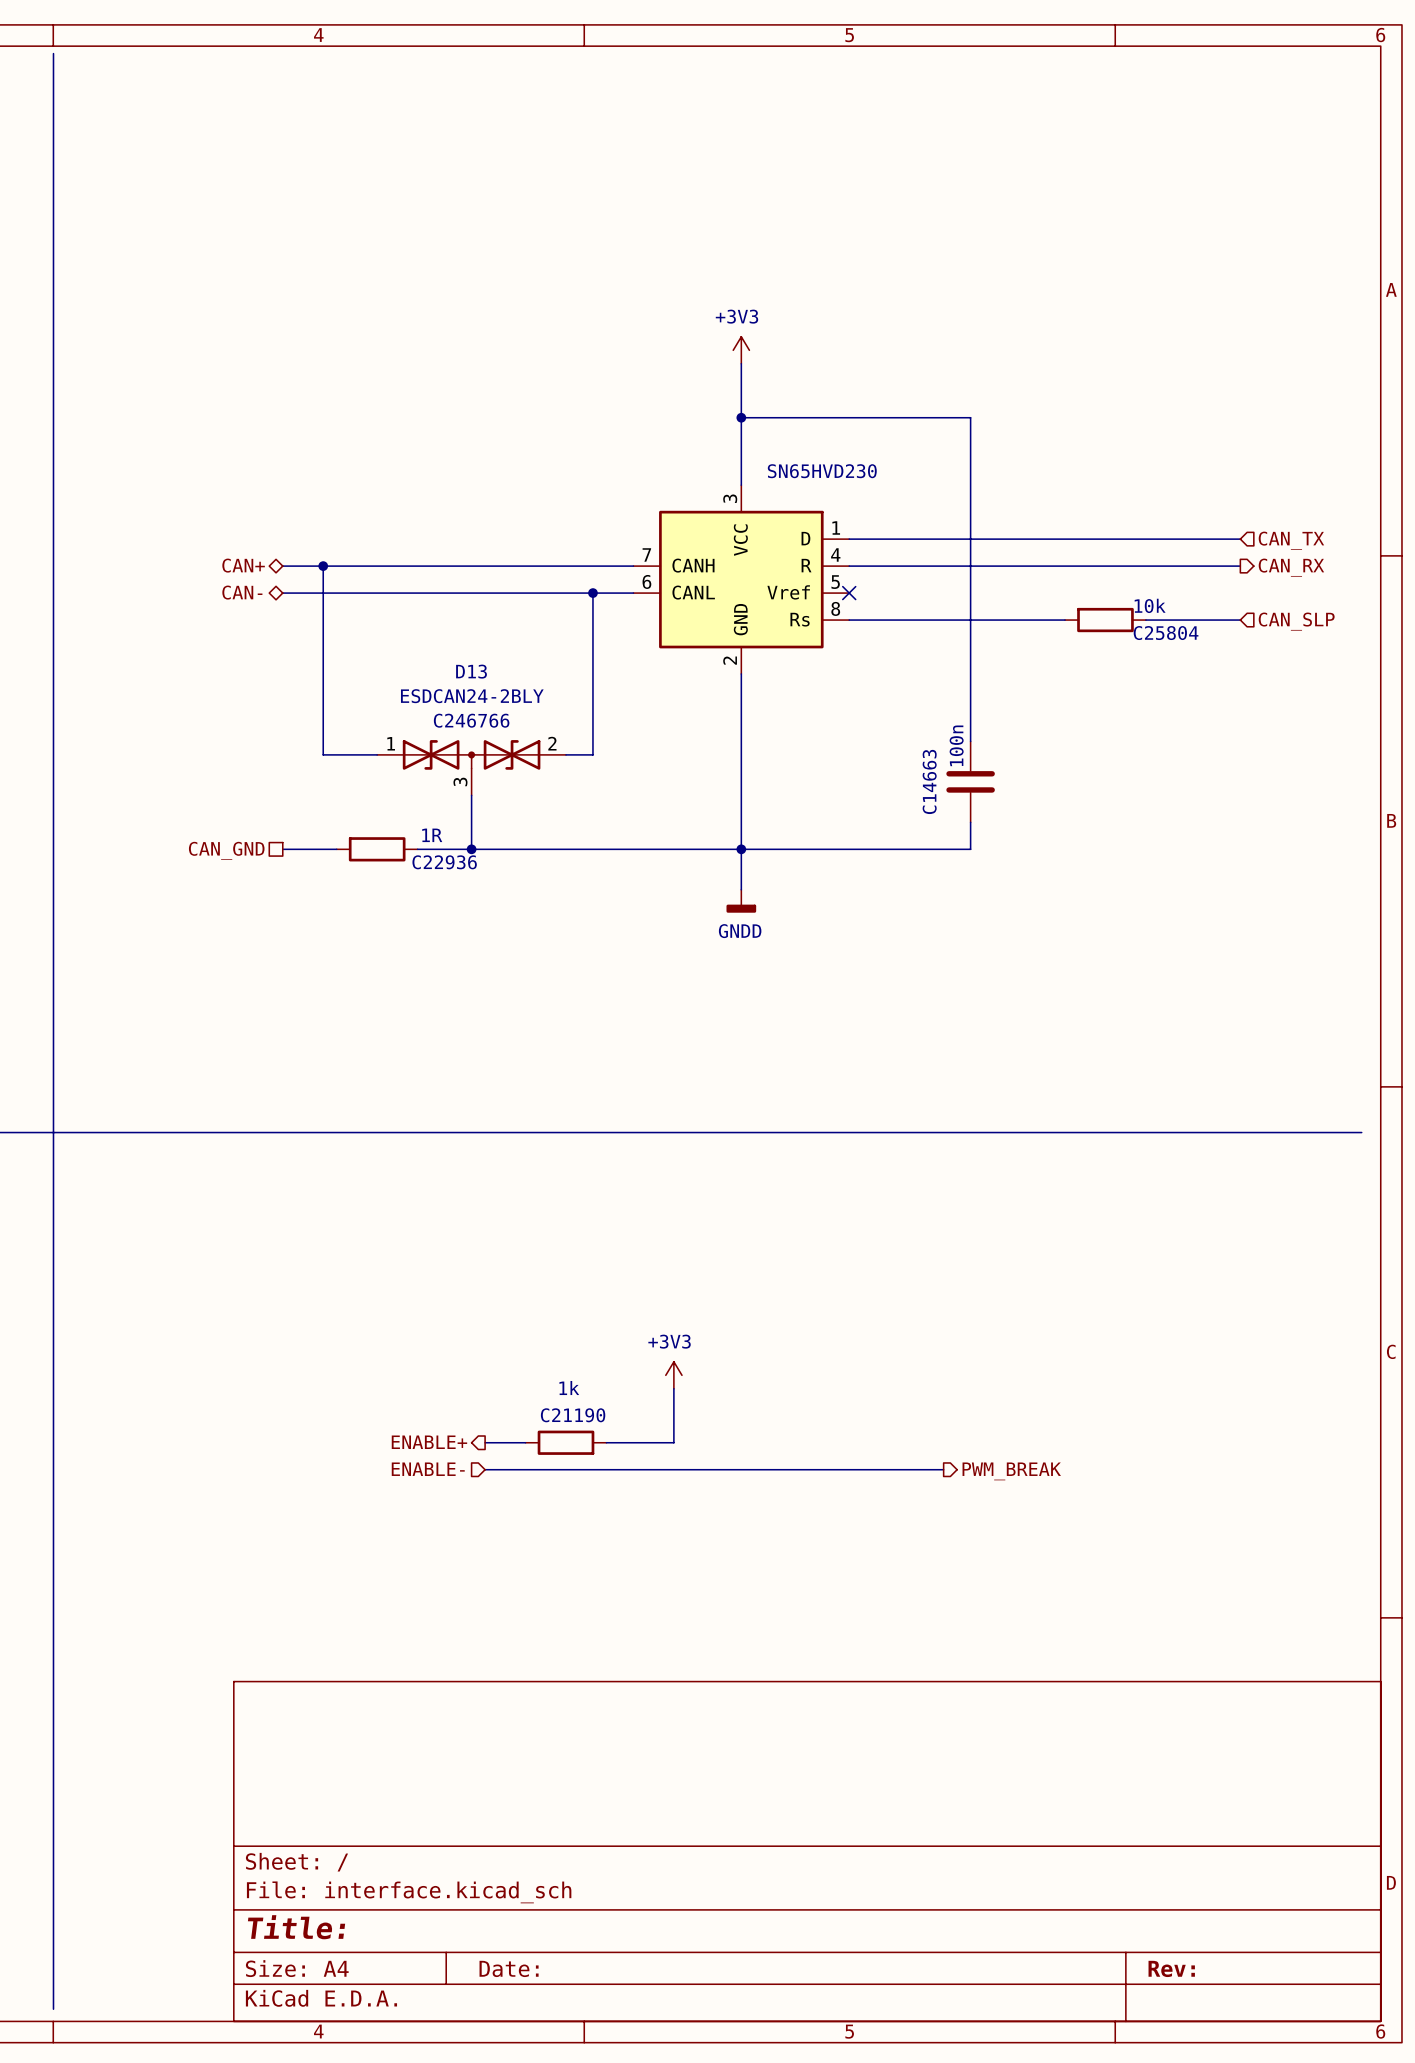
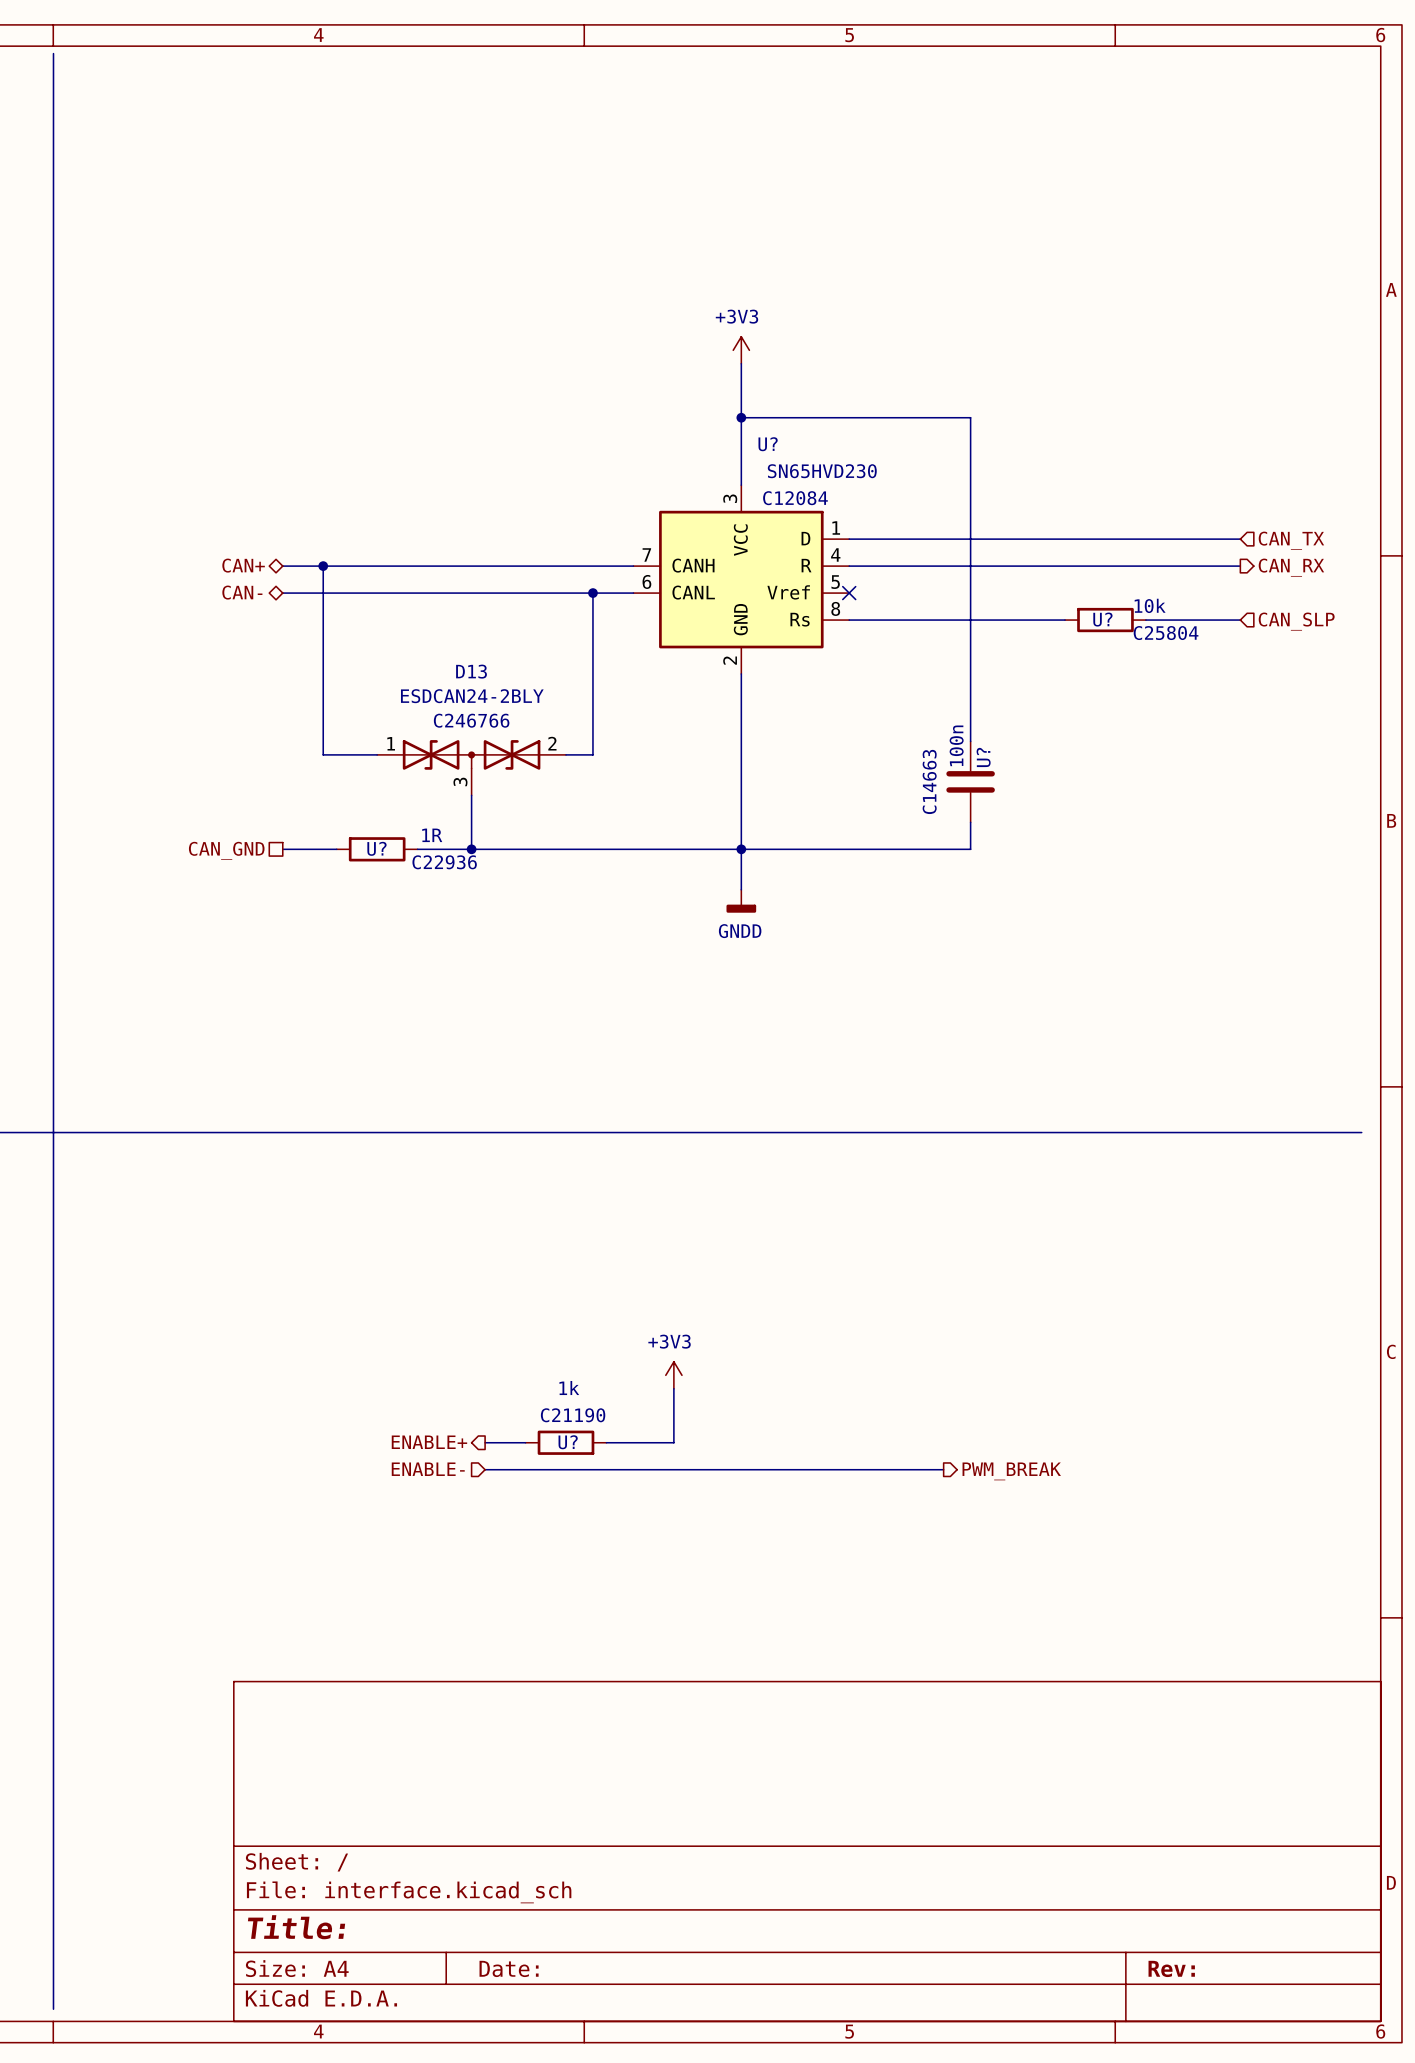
U? name: none -> U? (768, 444)
U? text: none -> C12084 (795, 498)
U? name: none -> U? (1102, 619)
U? name: none -> U? (983, 757)
U? name: none -> U? (376, 848)
U? name: none -> U? (568, 1442)

